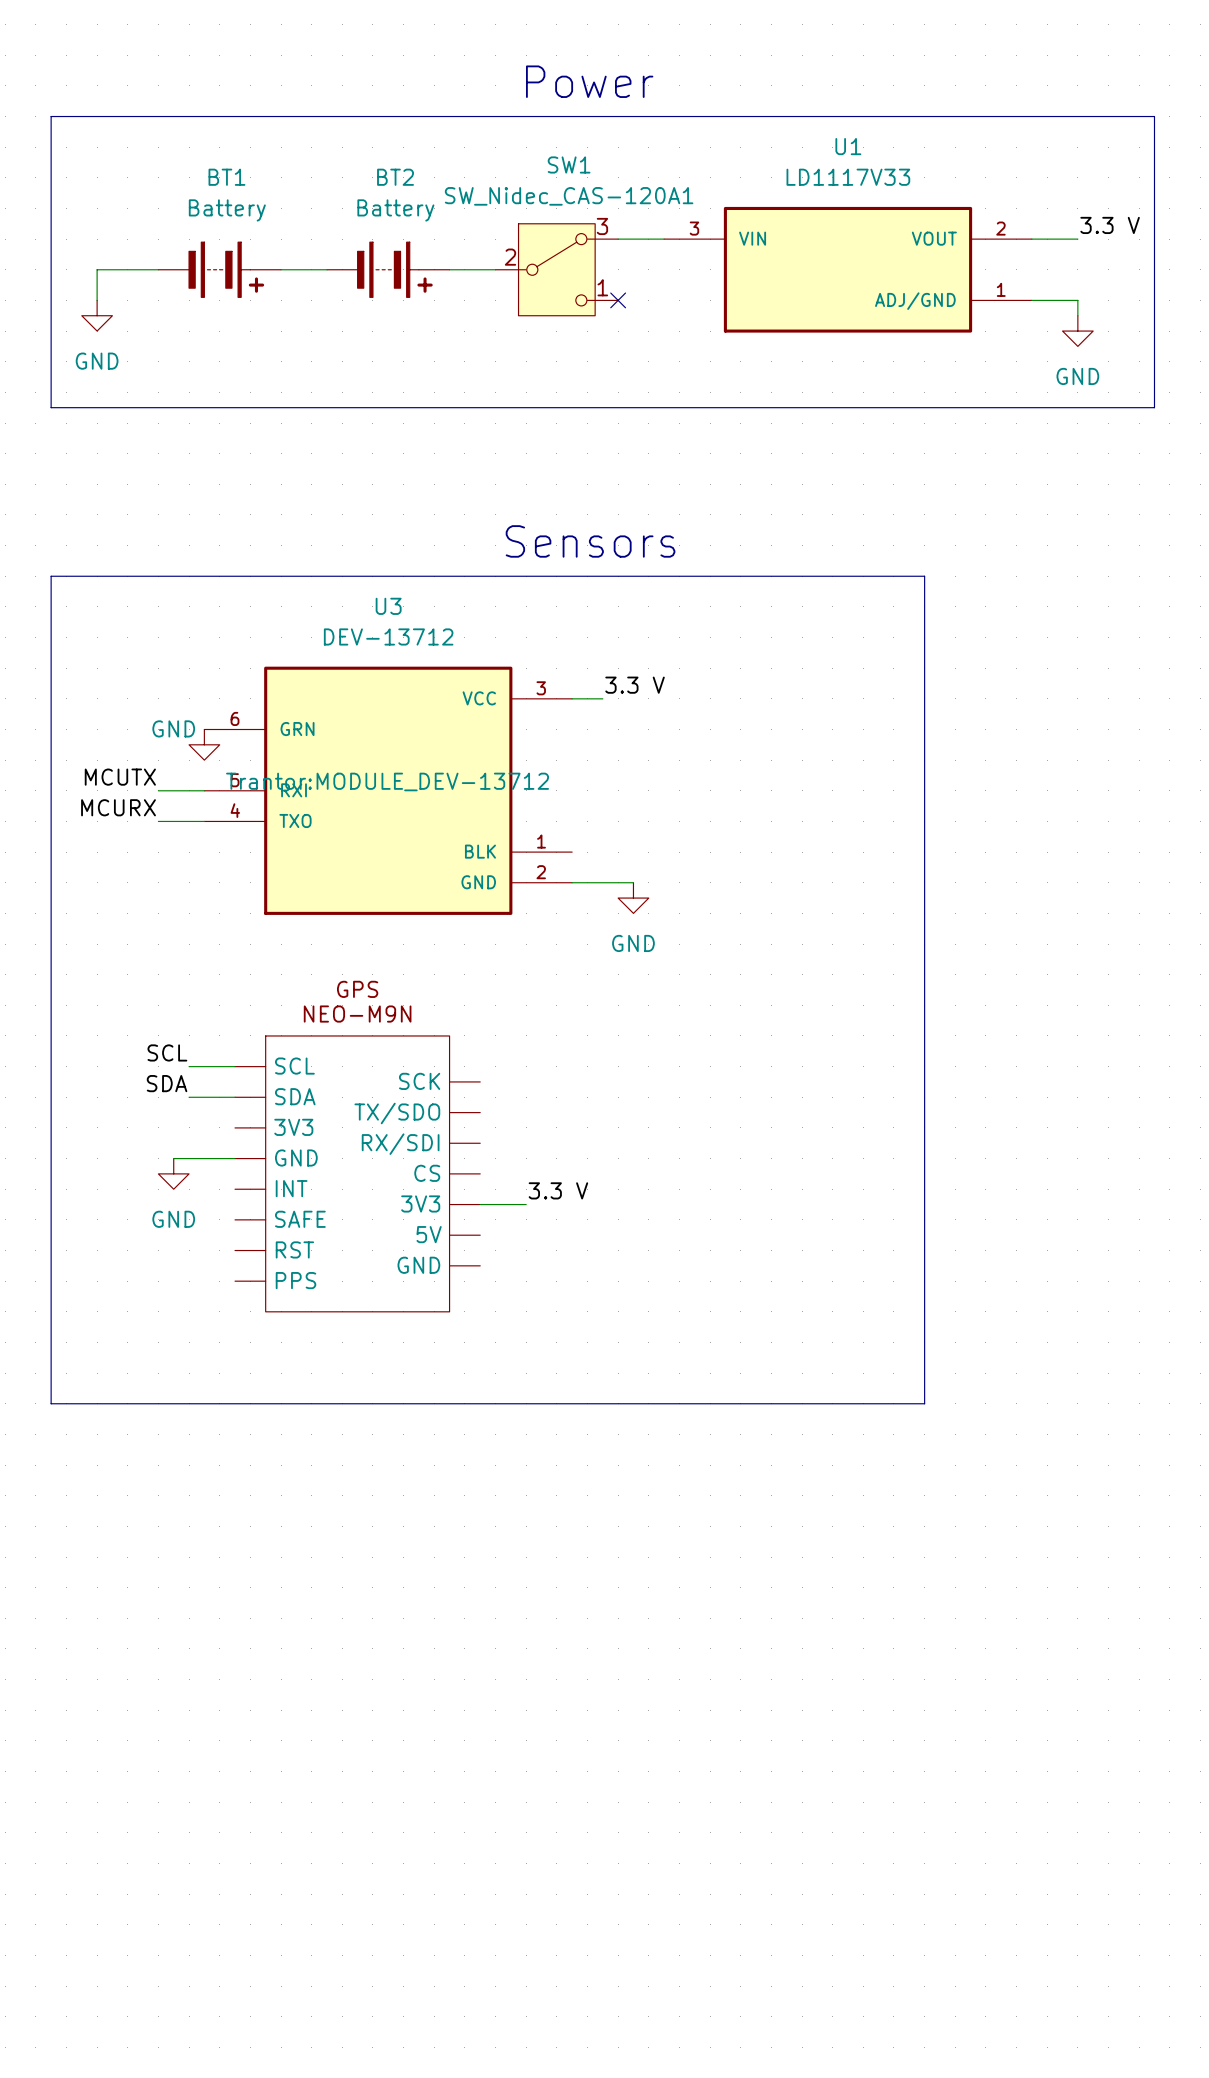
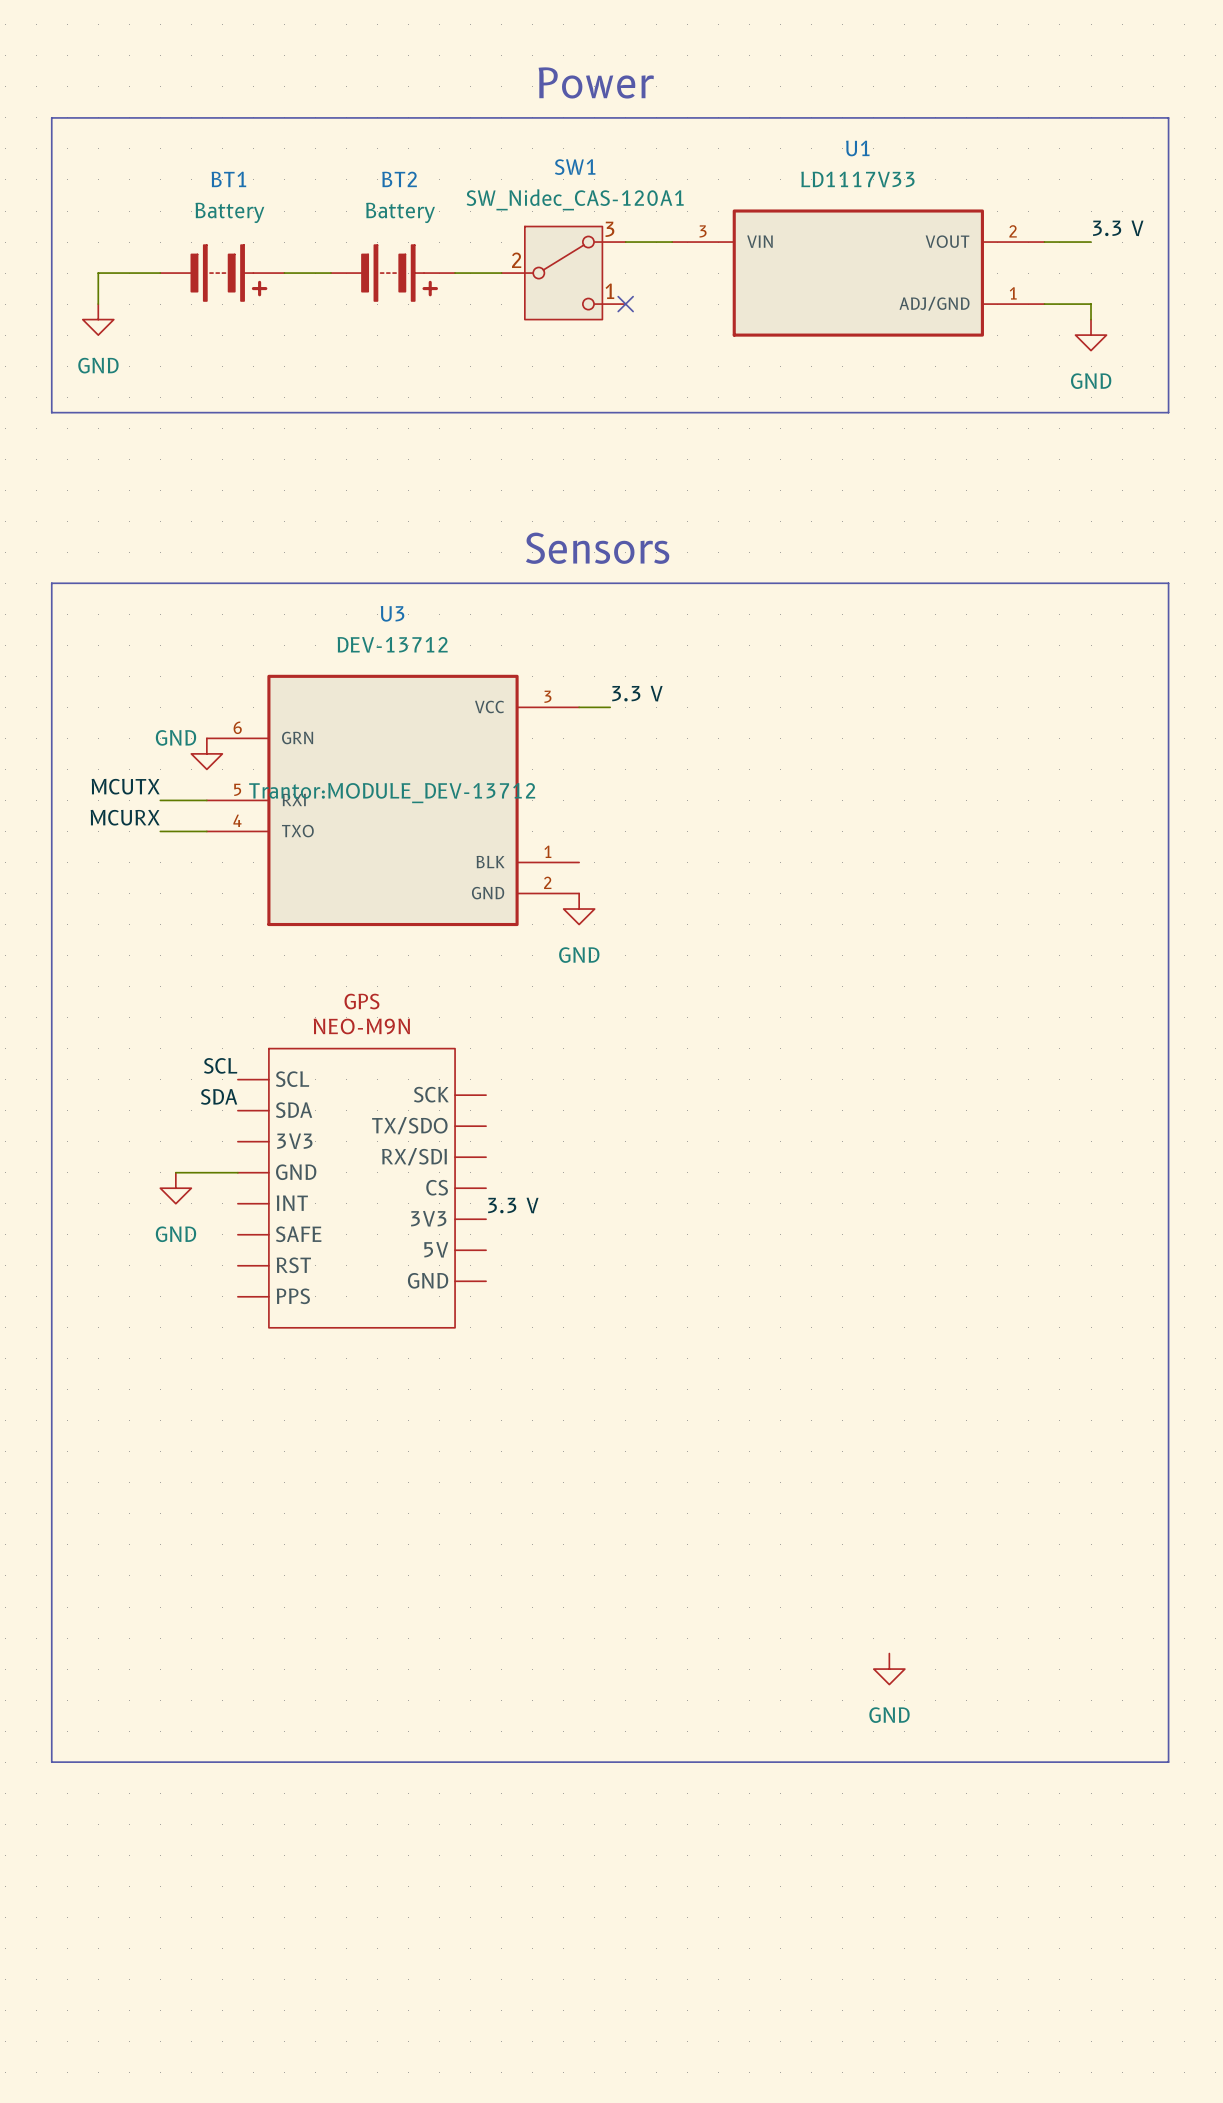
line: (924, 576) (924, 1403) (51, 1403) -> (935, 583) (1168, 583) (1168, 1762) (51, 1762) (51, 1420)
wire: (572, 882) (633, 882) -> none
power symbol position: GND (633, 898) -> GND (579, 909)
label position: SCL (167, 1052) -> SCL (220, 1065)
wire: (189, 1066) (235, 1066) -> none
label position: SDA (167, 1083) -> SDA (219, 1096)
wire: (189, 1097) (235, 1097) -> none
label position: 3.3 V (558, 1190) -> 3.3 V (513, 1205)
wire: (480, 1204) (526, 1204) -> none
power symbol: none -> GND (889, 1669)

